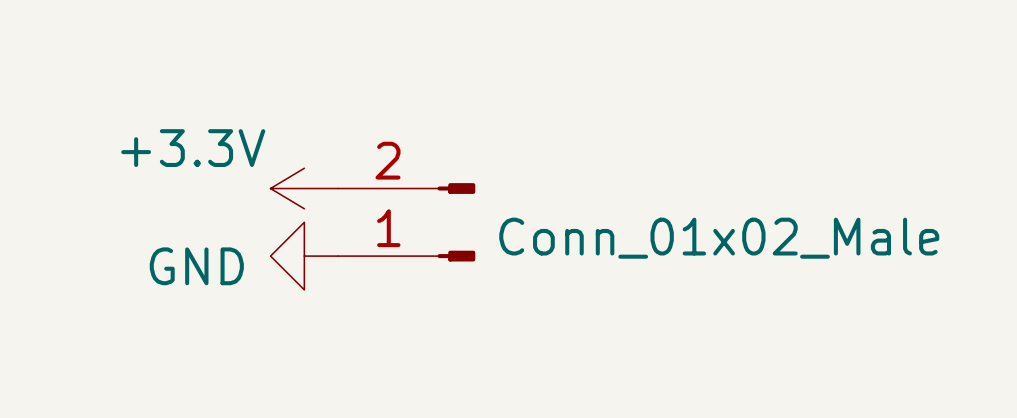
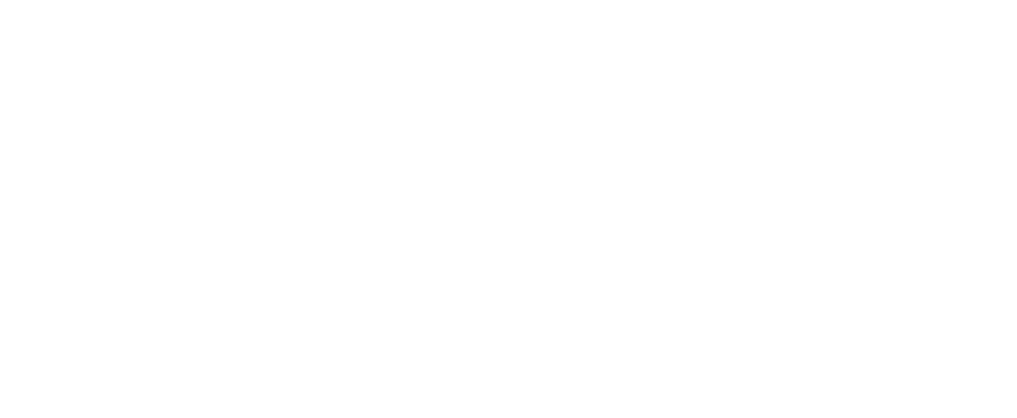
power symbol: +3.3V (304, 188) -> none
part: Conn_01x02_Male (406, 222) -> none
power symbol: GND (304, 256) -> none

